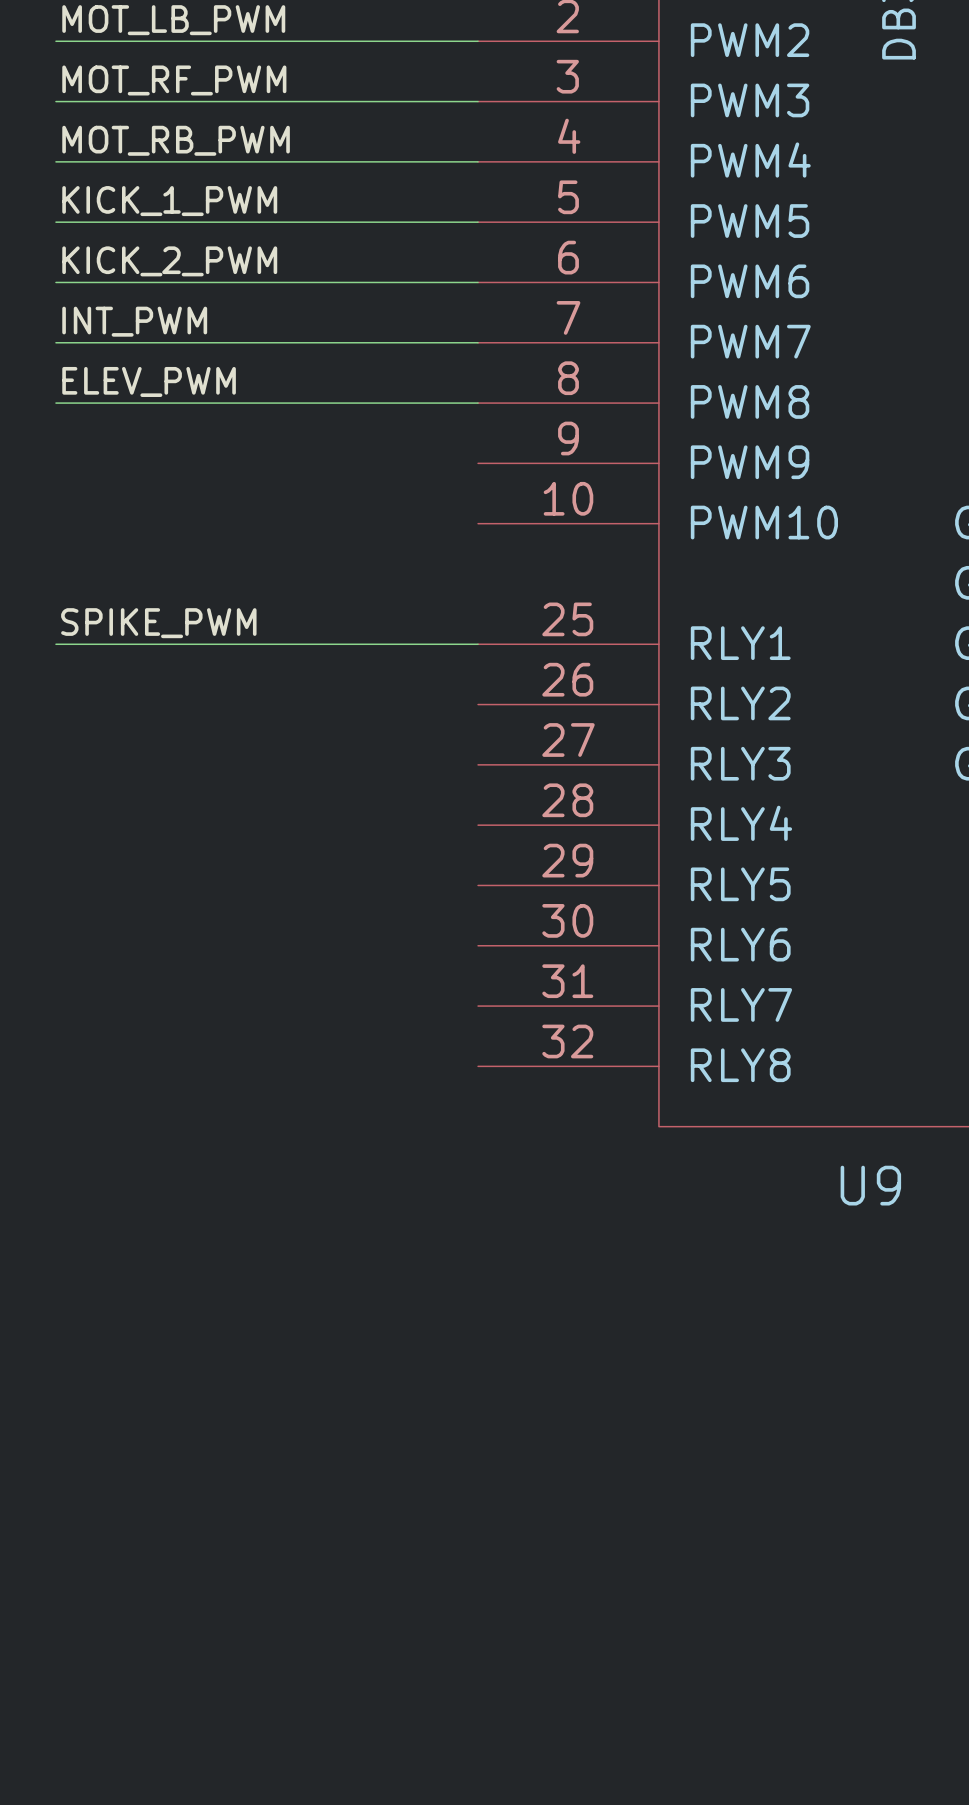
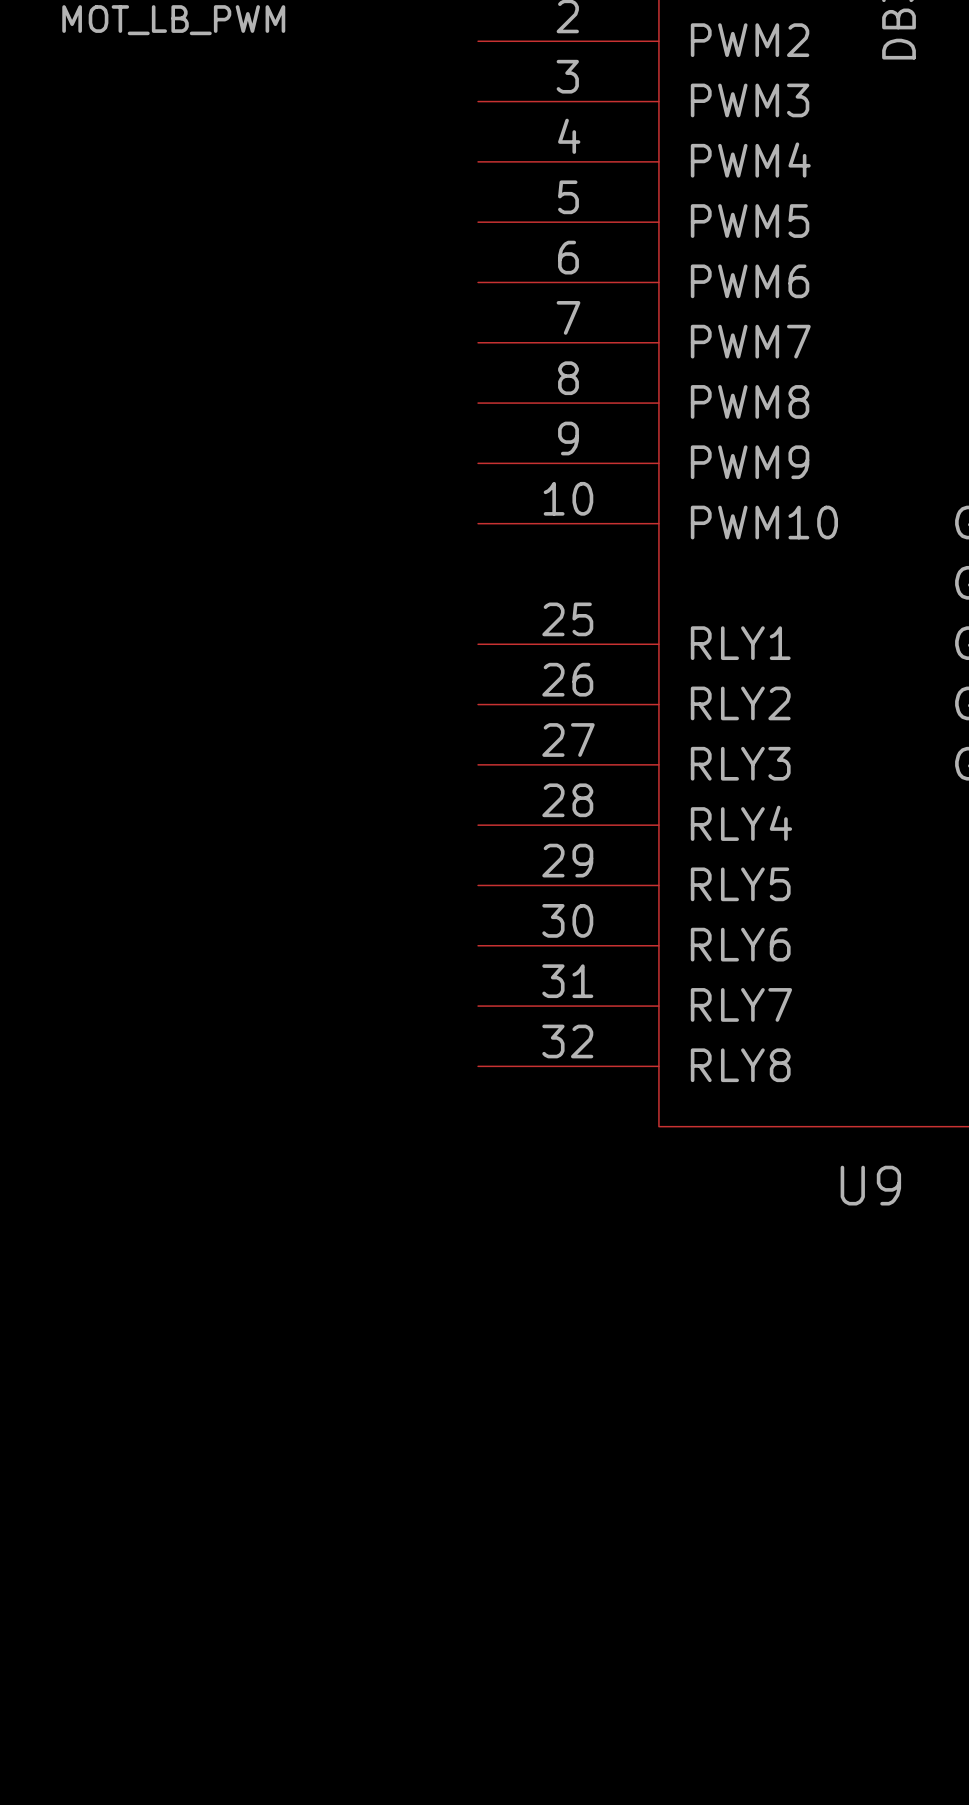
wire: (55, 41) (478, 41) -> none
label: MOT_RF_PWM (174, 80) -> none
wire: (55, 101) (478, 101) -> none
label: MOT_RB_PWM (176, 140) -> none
wire: (55, 161) (478, 161) -> none
label: KICK_1_PWM (169, 201) -> none
wire: (55, 222) (478, 222) -> none
label: KICK_2_PWM (169, 261) -> none
wire: (55, 282) (478, 282) -> none
label: INT_PWM (134, 321) -> none
wire: (55, 342) (478, 342) -> none
label: ELEV_PWM (149, 381) -> none
wire: (55, 403) (478, 403) -> none
label: SPIKE_PWM (158, 623) -> none
wire: (55, 644) (478, 644) -> none

